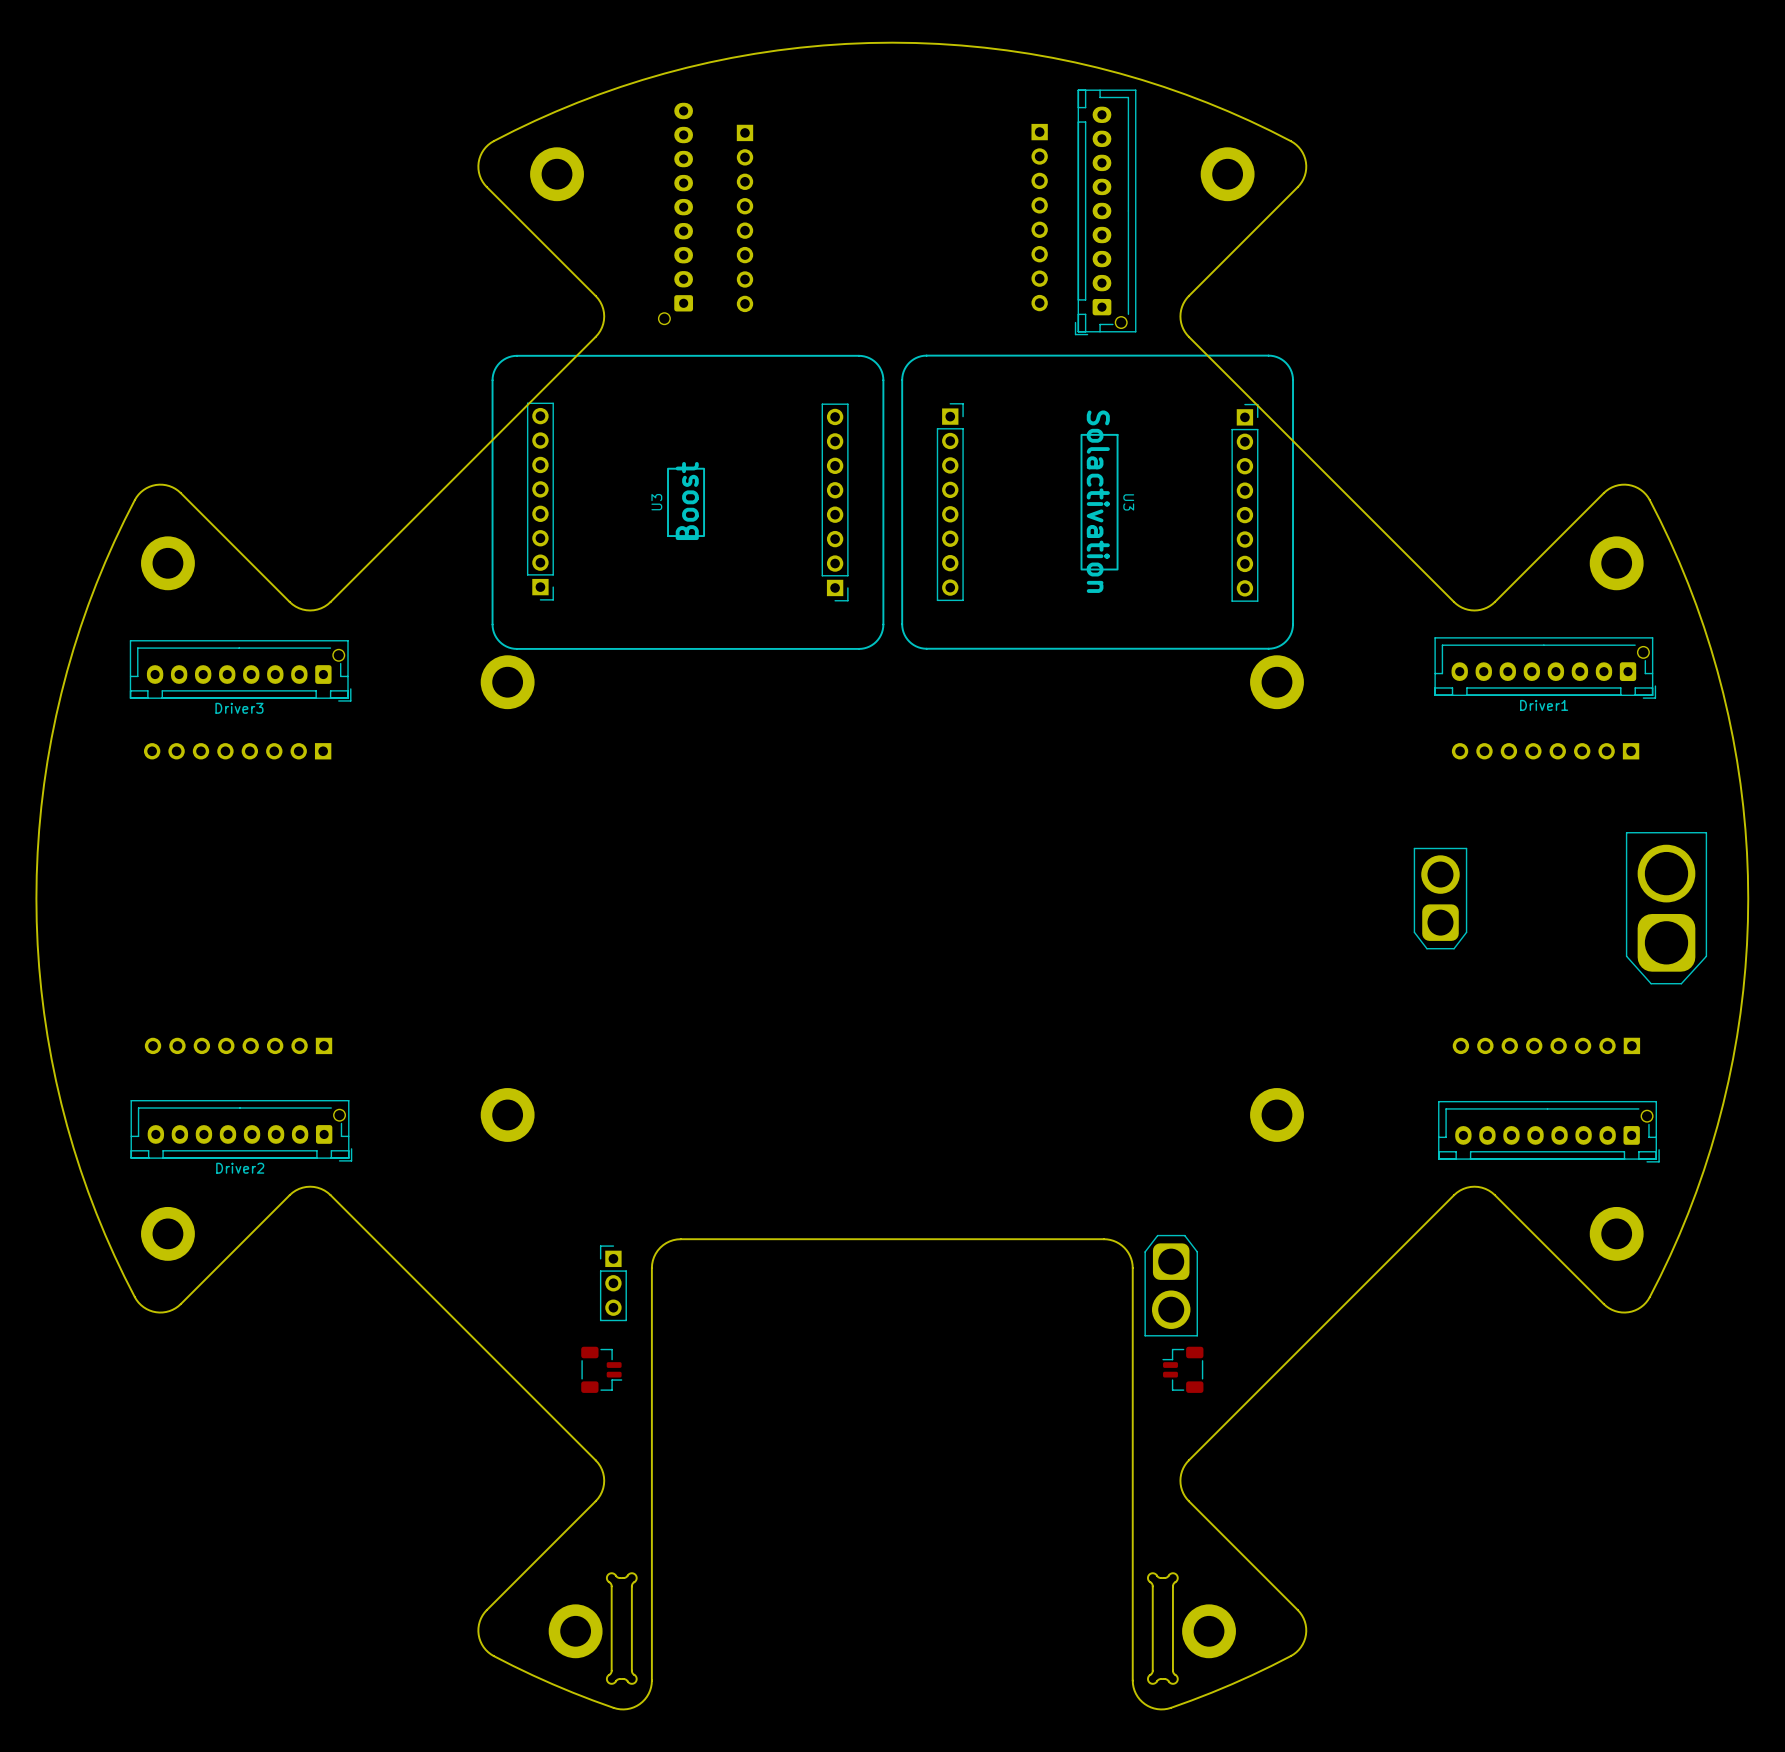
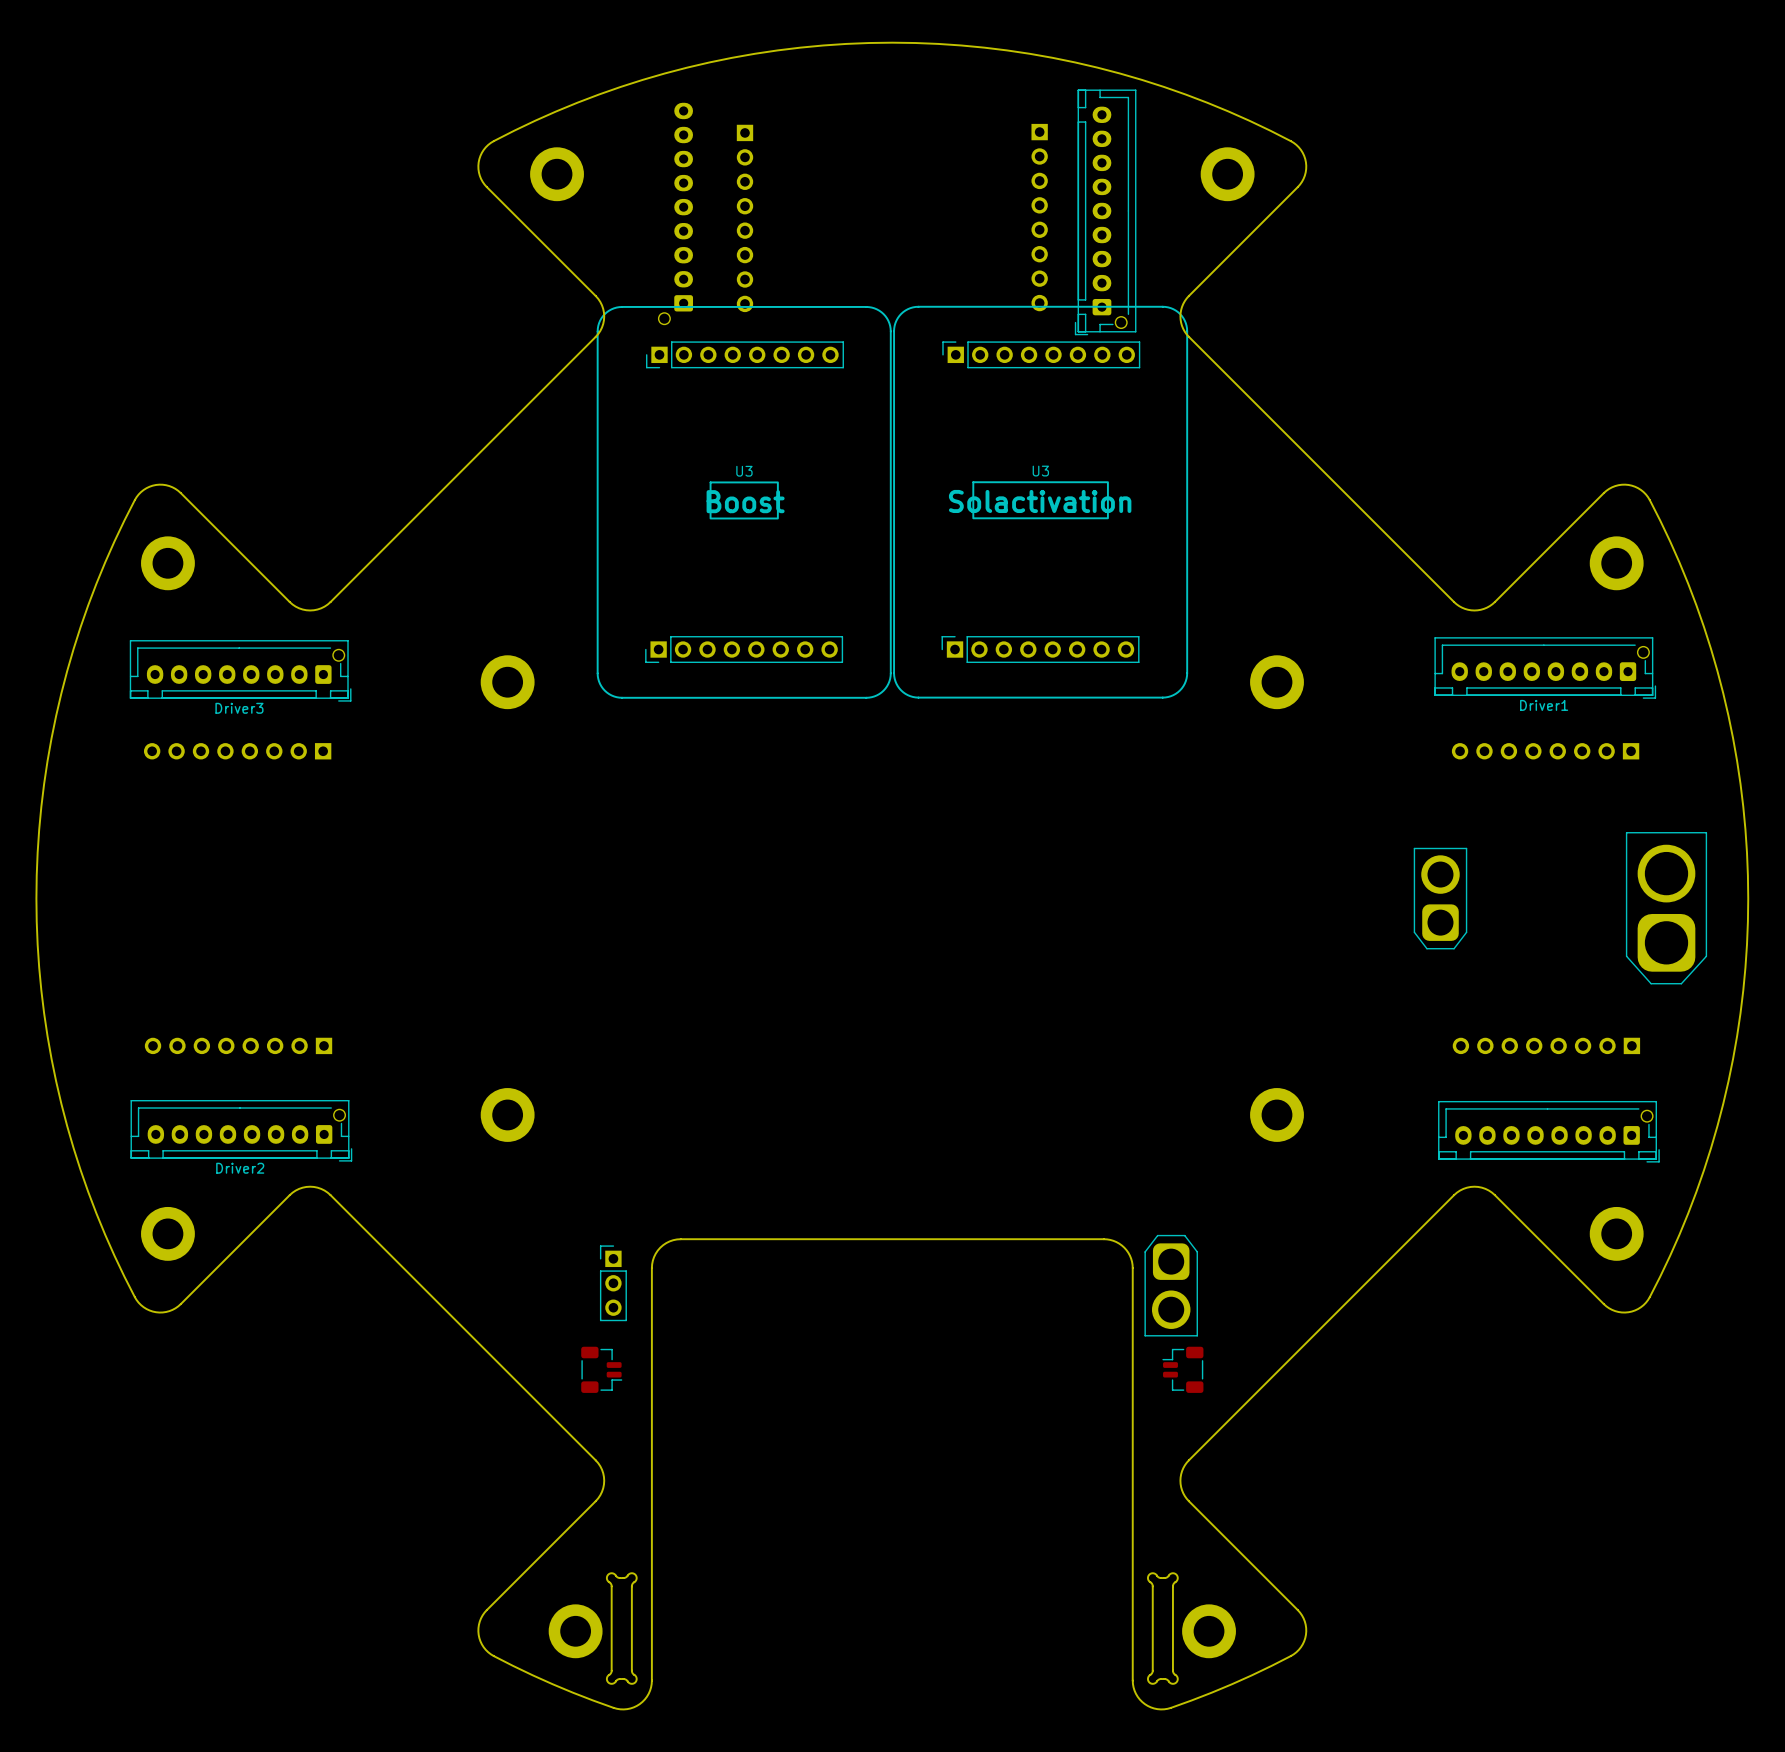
part: none -> (744, 354)
part: none -> (1041, 354)
part: (540, 501) -> none
U3 rotation: 0° (687, 502) -> 90° clockwise (744, 502)
part: (835, 502) -> none
part: (950, 502) -> none
U3 rotation: 0° (1097, 502) -> 90° counterclockwise (1040, 502)
part: (1244, 502) -> none
part: none -> (744, 649)
part: none -> (1040, 649)

